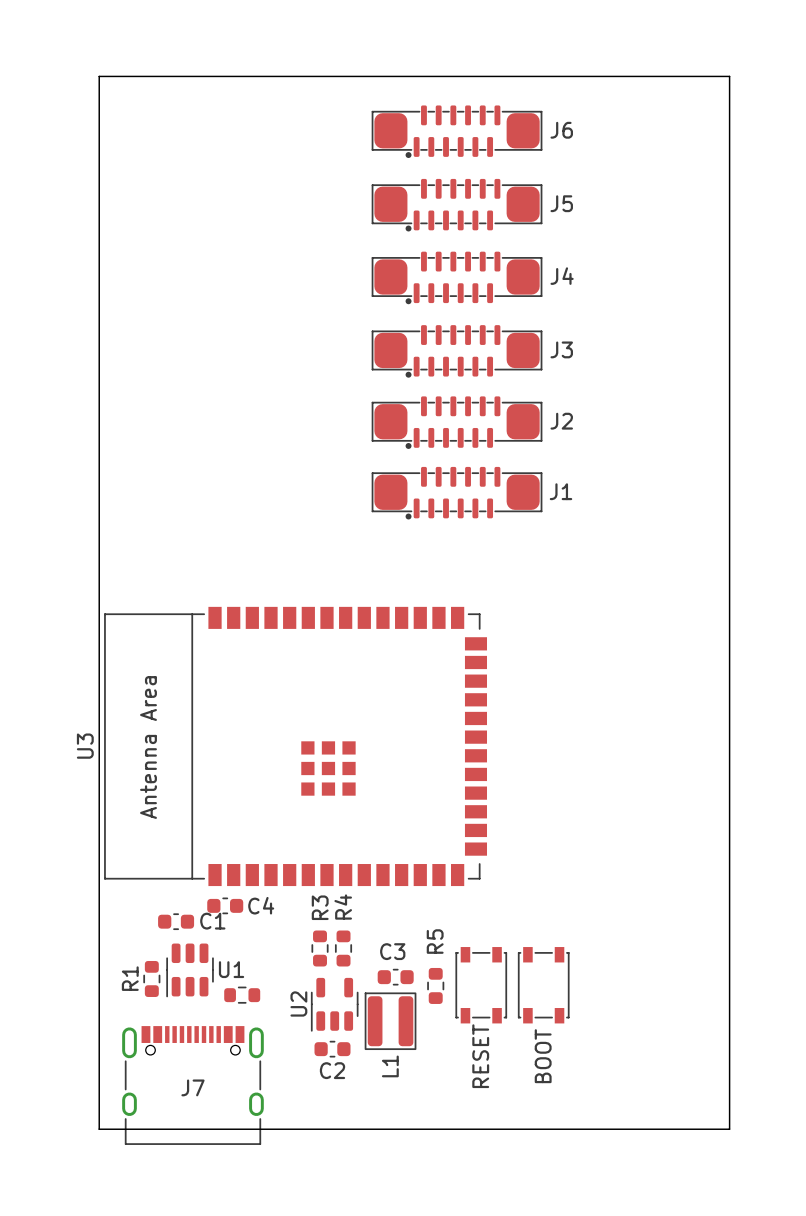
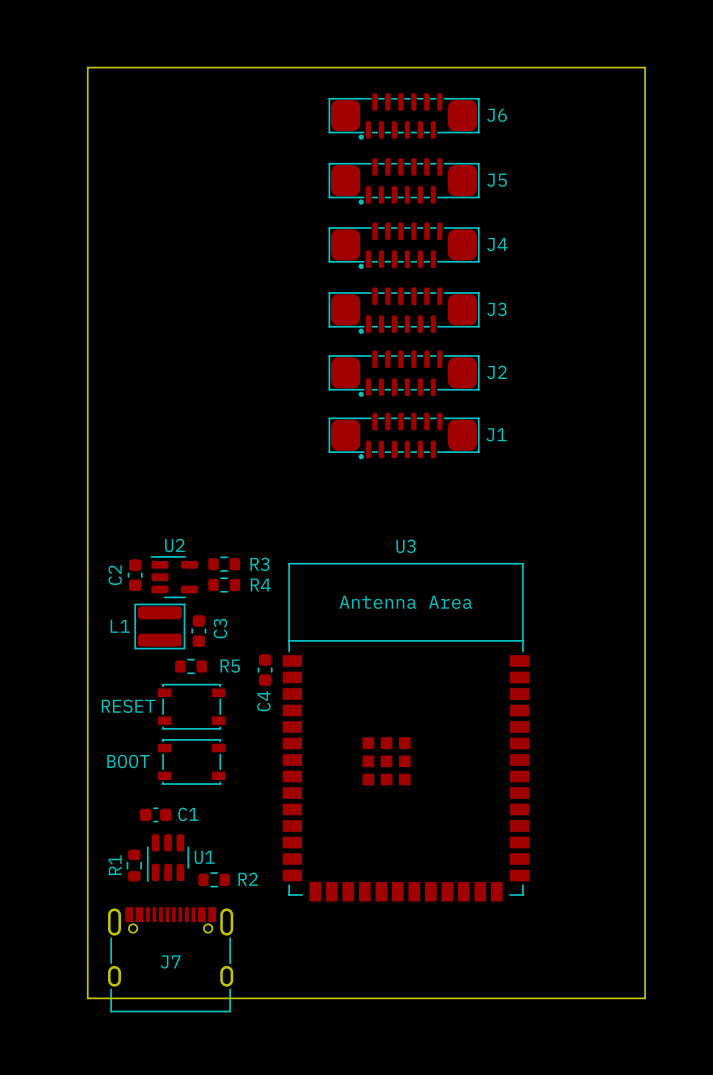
U3 rotation: 0° (295, 746) -> 90° clockwise (406, 732)
C4 rotation: 0° (225, 905) -> 90° clockwise (265, 670)
C4 position: (225, 905) -> (265, 670)
R3 rotation: 0° (320, 948) -> 90° clockwise (224, 564)
R3 position: (320, 948) -> (224, 564)
R4 rotation: 0° (343, 948) -> 90° clockwise (224, 584)
R4 position: (343, 948) -> (224, 584)
C3 rotation: 0° (395, 977) -> 90° clockwise (198, 631)
C3 position: (395, 977) -> (198, 631)
R5 rotation: 0° (435, 985) -> 90° clockwise (191, 666)
R5 position: (435, 985) -> (191, 666)
part rotation: 0° (481, 985) -> 90° clockwise (191, 706)
part position: (481, 985) -> (191, 706)
part rotation: 0° (543, 985) -> 90° clockwise (191, 761)
part position: (543, 985) -> (191, 761)
R2 name: none -> R2 (248, 879)
U2 rotation: 0° (334, 1004) -> 90° clockwise (174, 577)
U2 position: (334, 1004) -> (174, 577)
L1 rotation: 0° (390, 1021) -> 90° clockwise (159, 626)
L1 position: (390, 1021) -> (159, 626)
C2 rotation: 0° (332, 1049) -> 90° clockwise (135, 575)
C2 position: (332, 1049) -> (135, 575)

